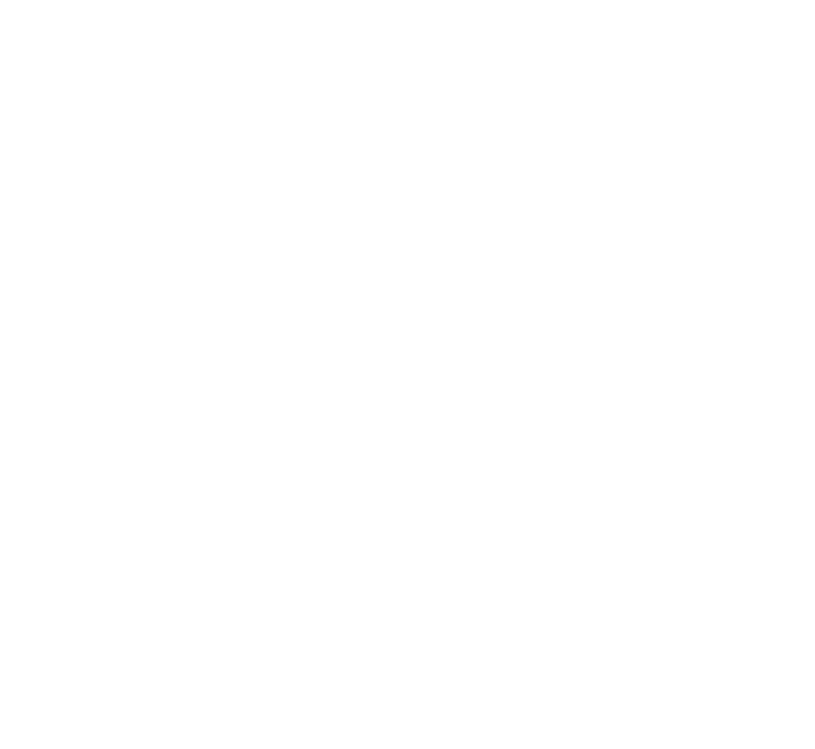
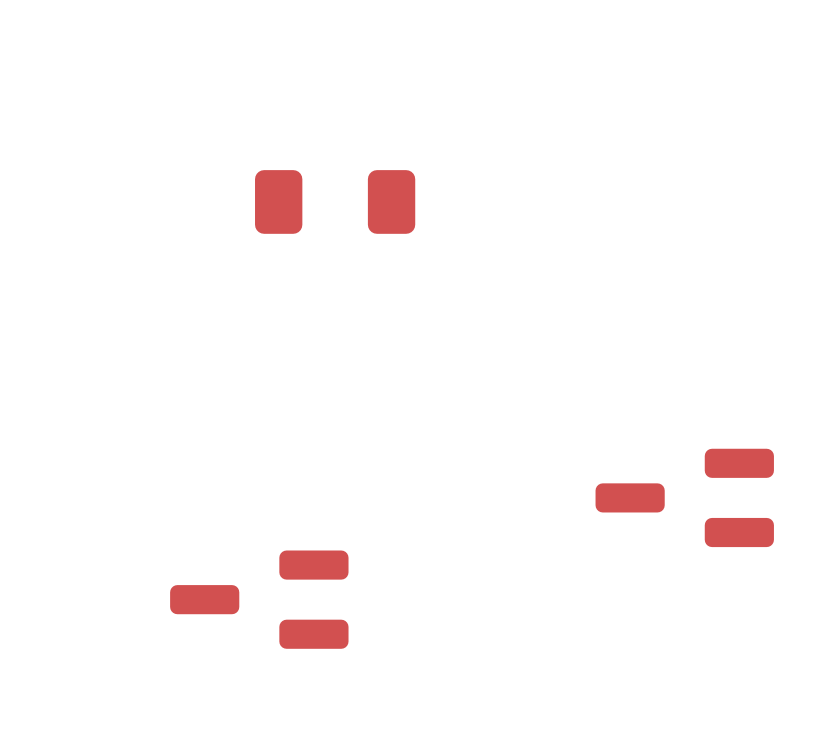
part: none -> (335, 201)
part: none -> (684, 497)
part: none -> (259, 599)

